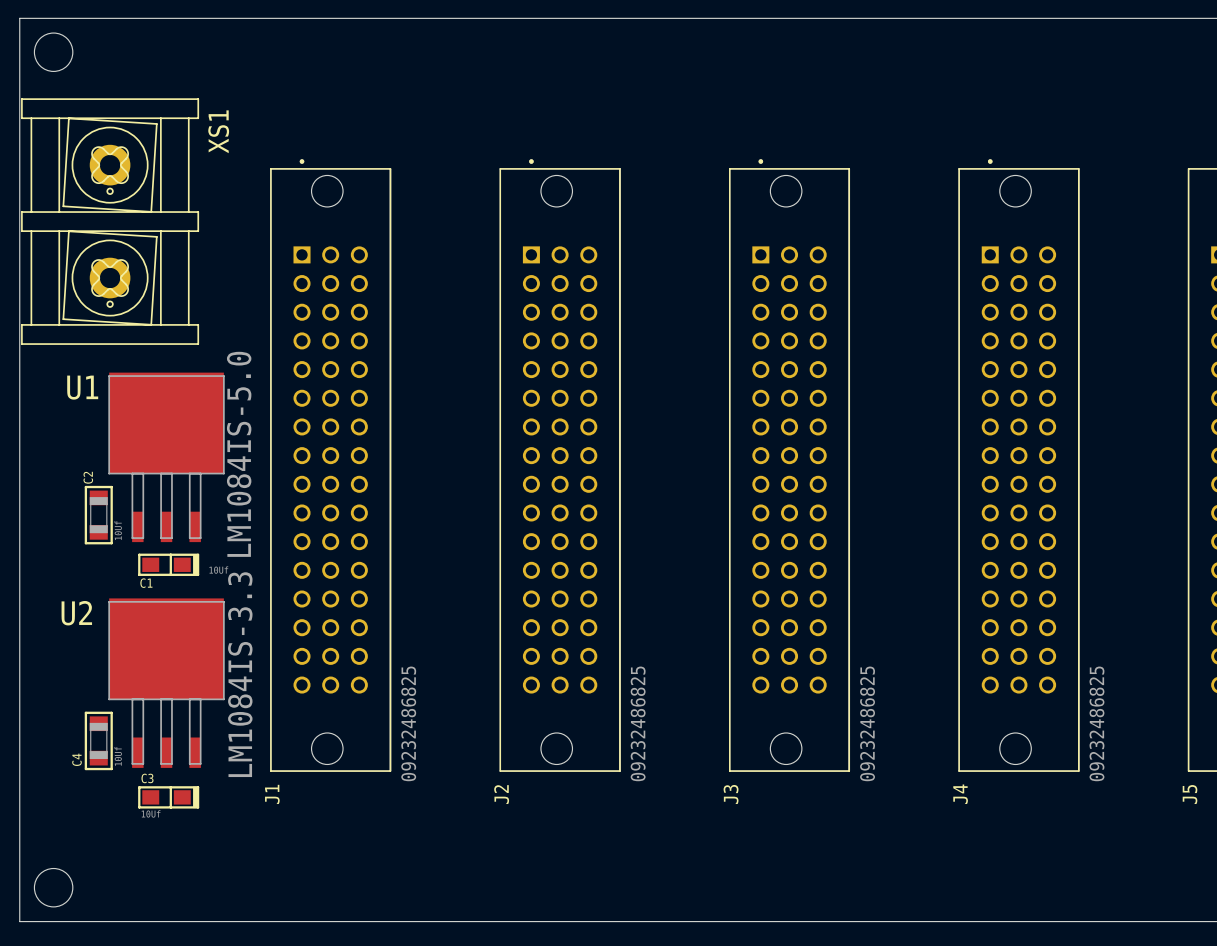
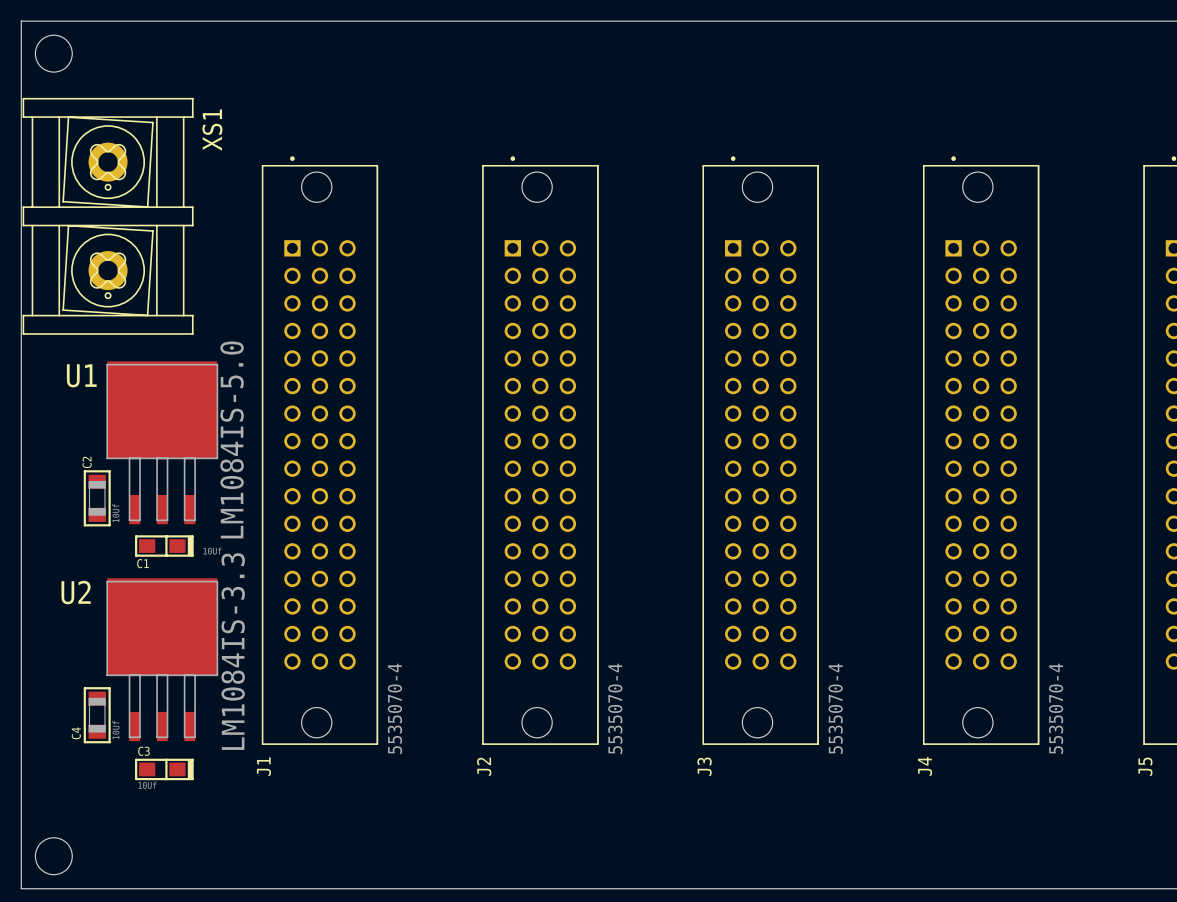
J1 value: 09232486825 (408, 723) -> 5535070-4 (394, 708)
J2 value: 09232486825 (638, 723) -> 5535070-4 (615, 708)
J3 value: 09232486825 (867, 723) -> 5535070-4 (835, 708)
J4 value: 09232486825 (1096, 723) -> 5535070-4 (1056, 708)

